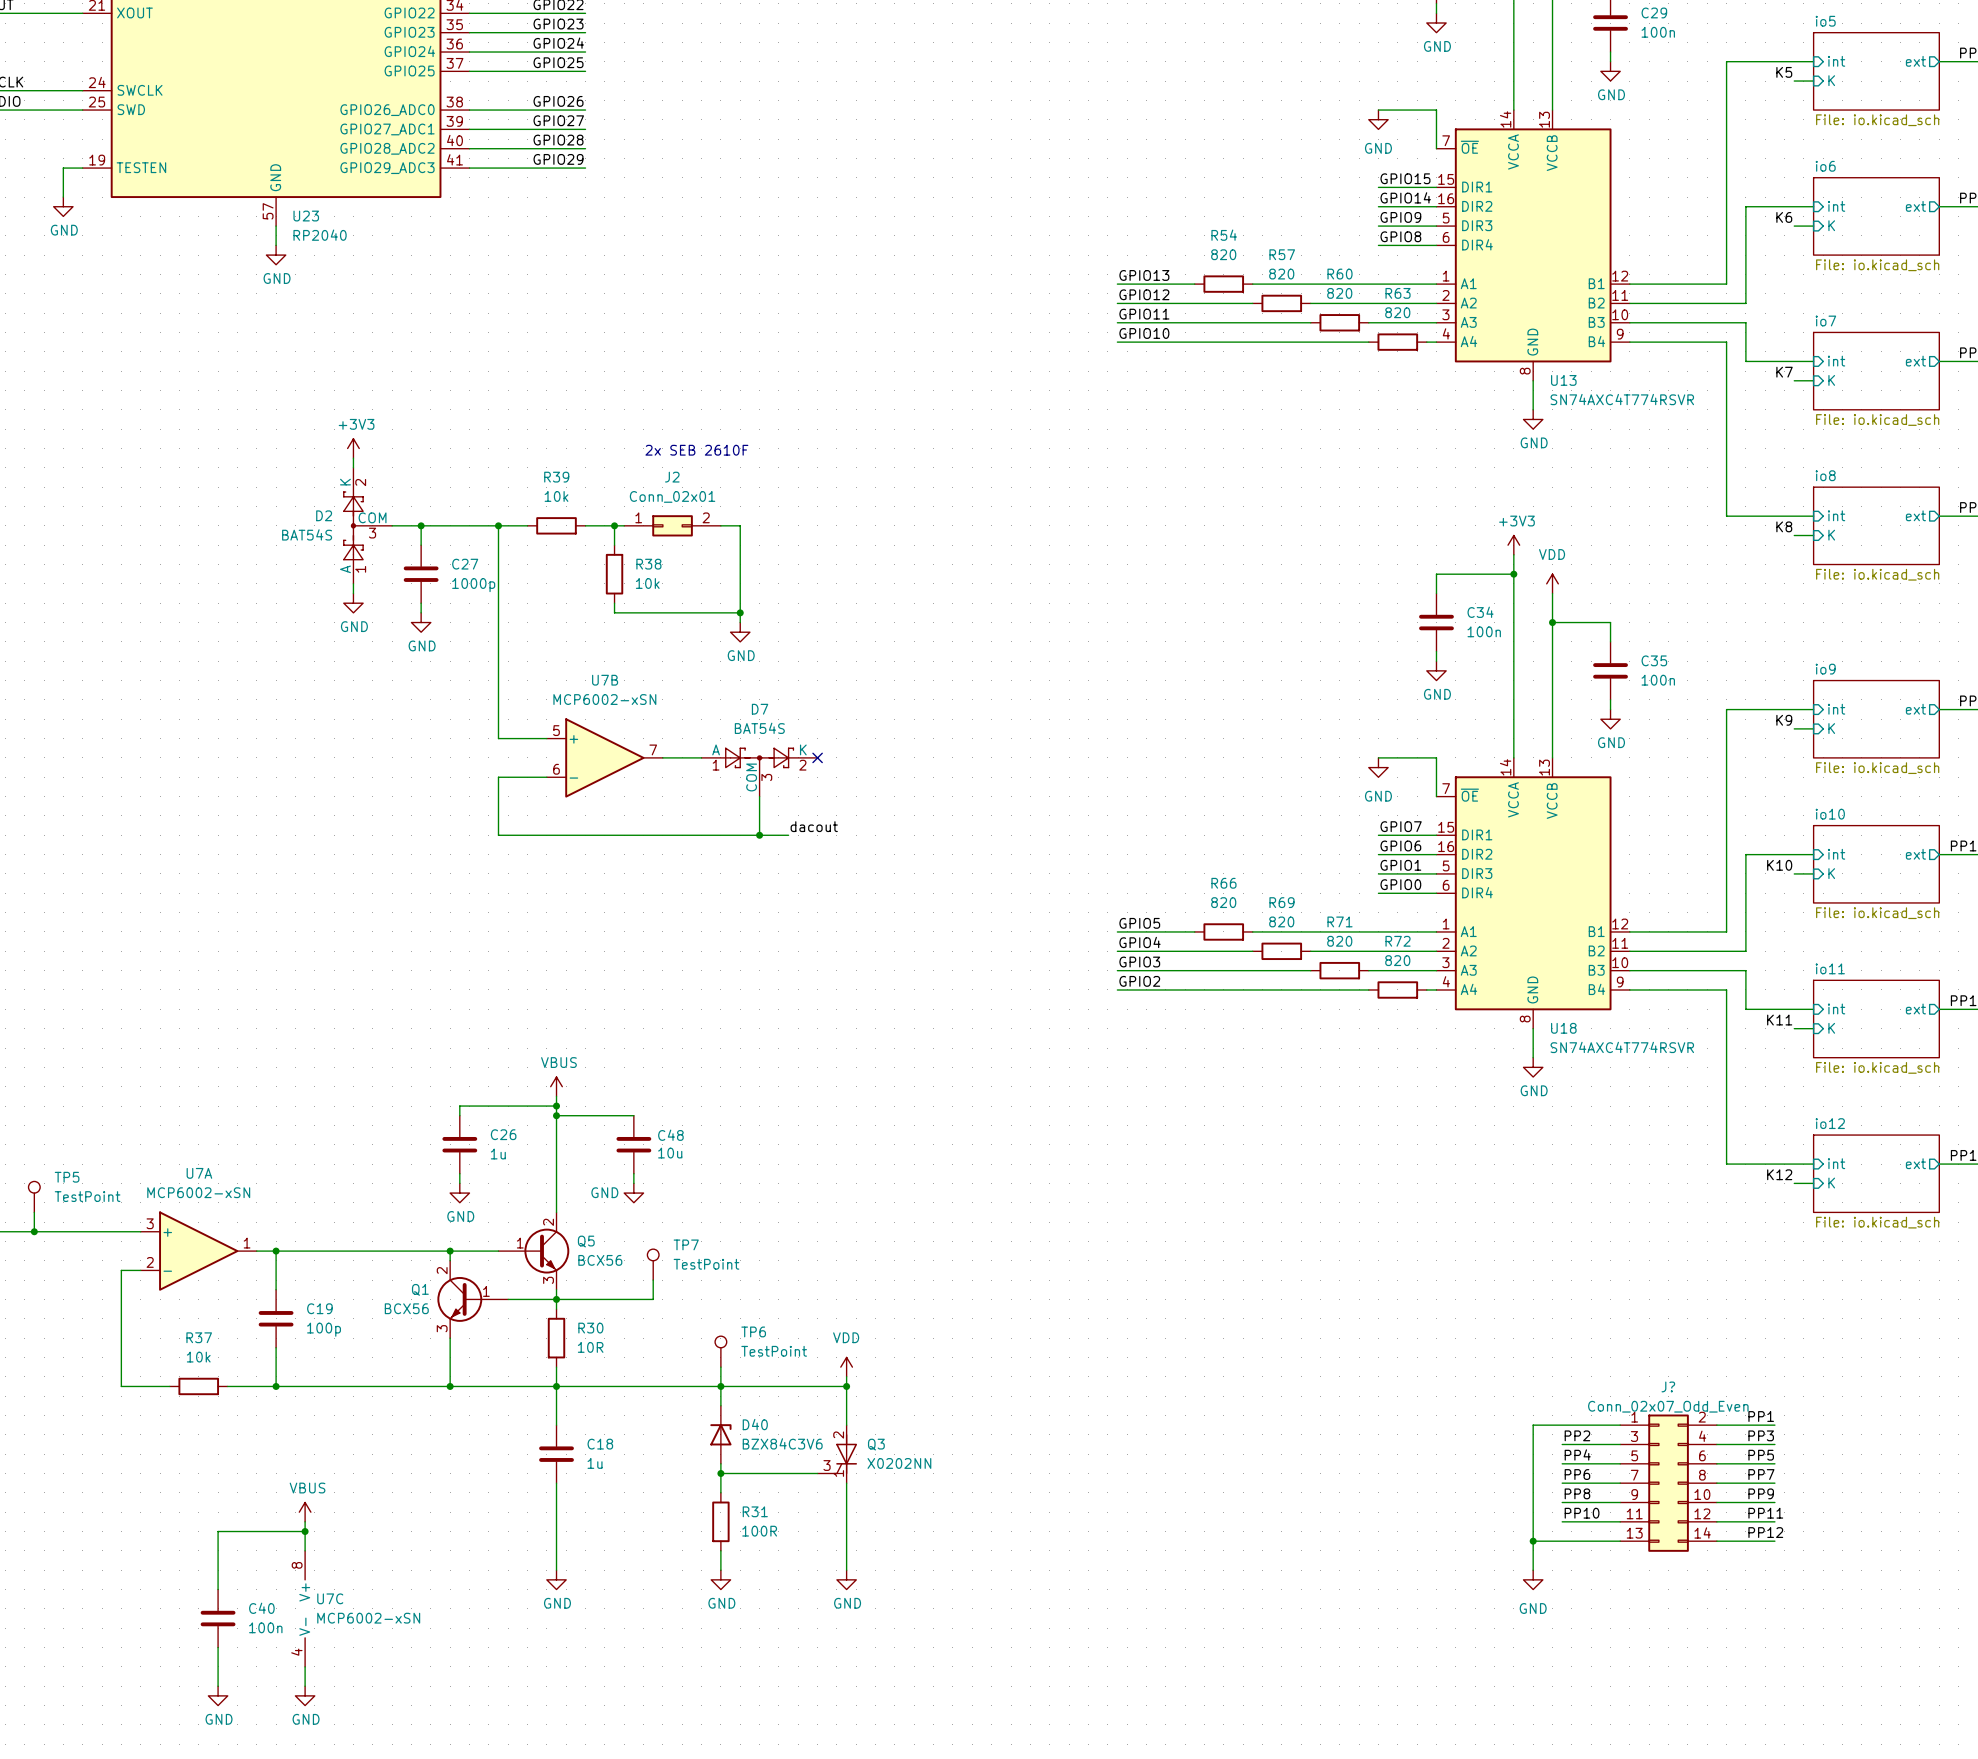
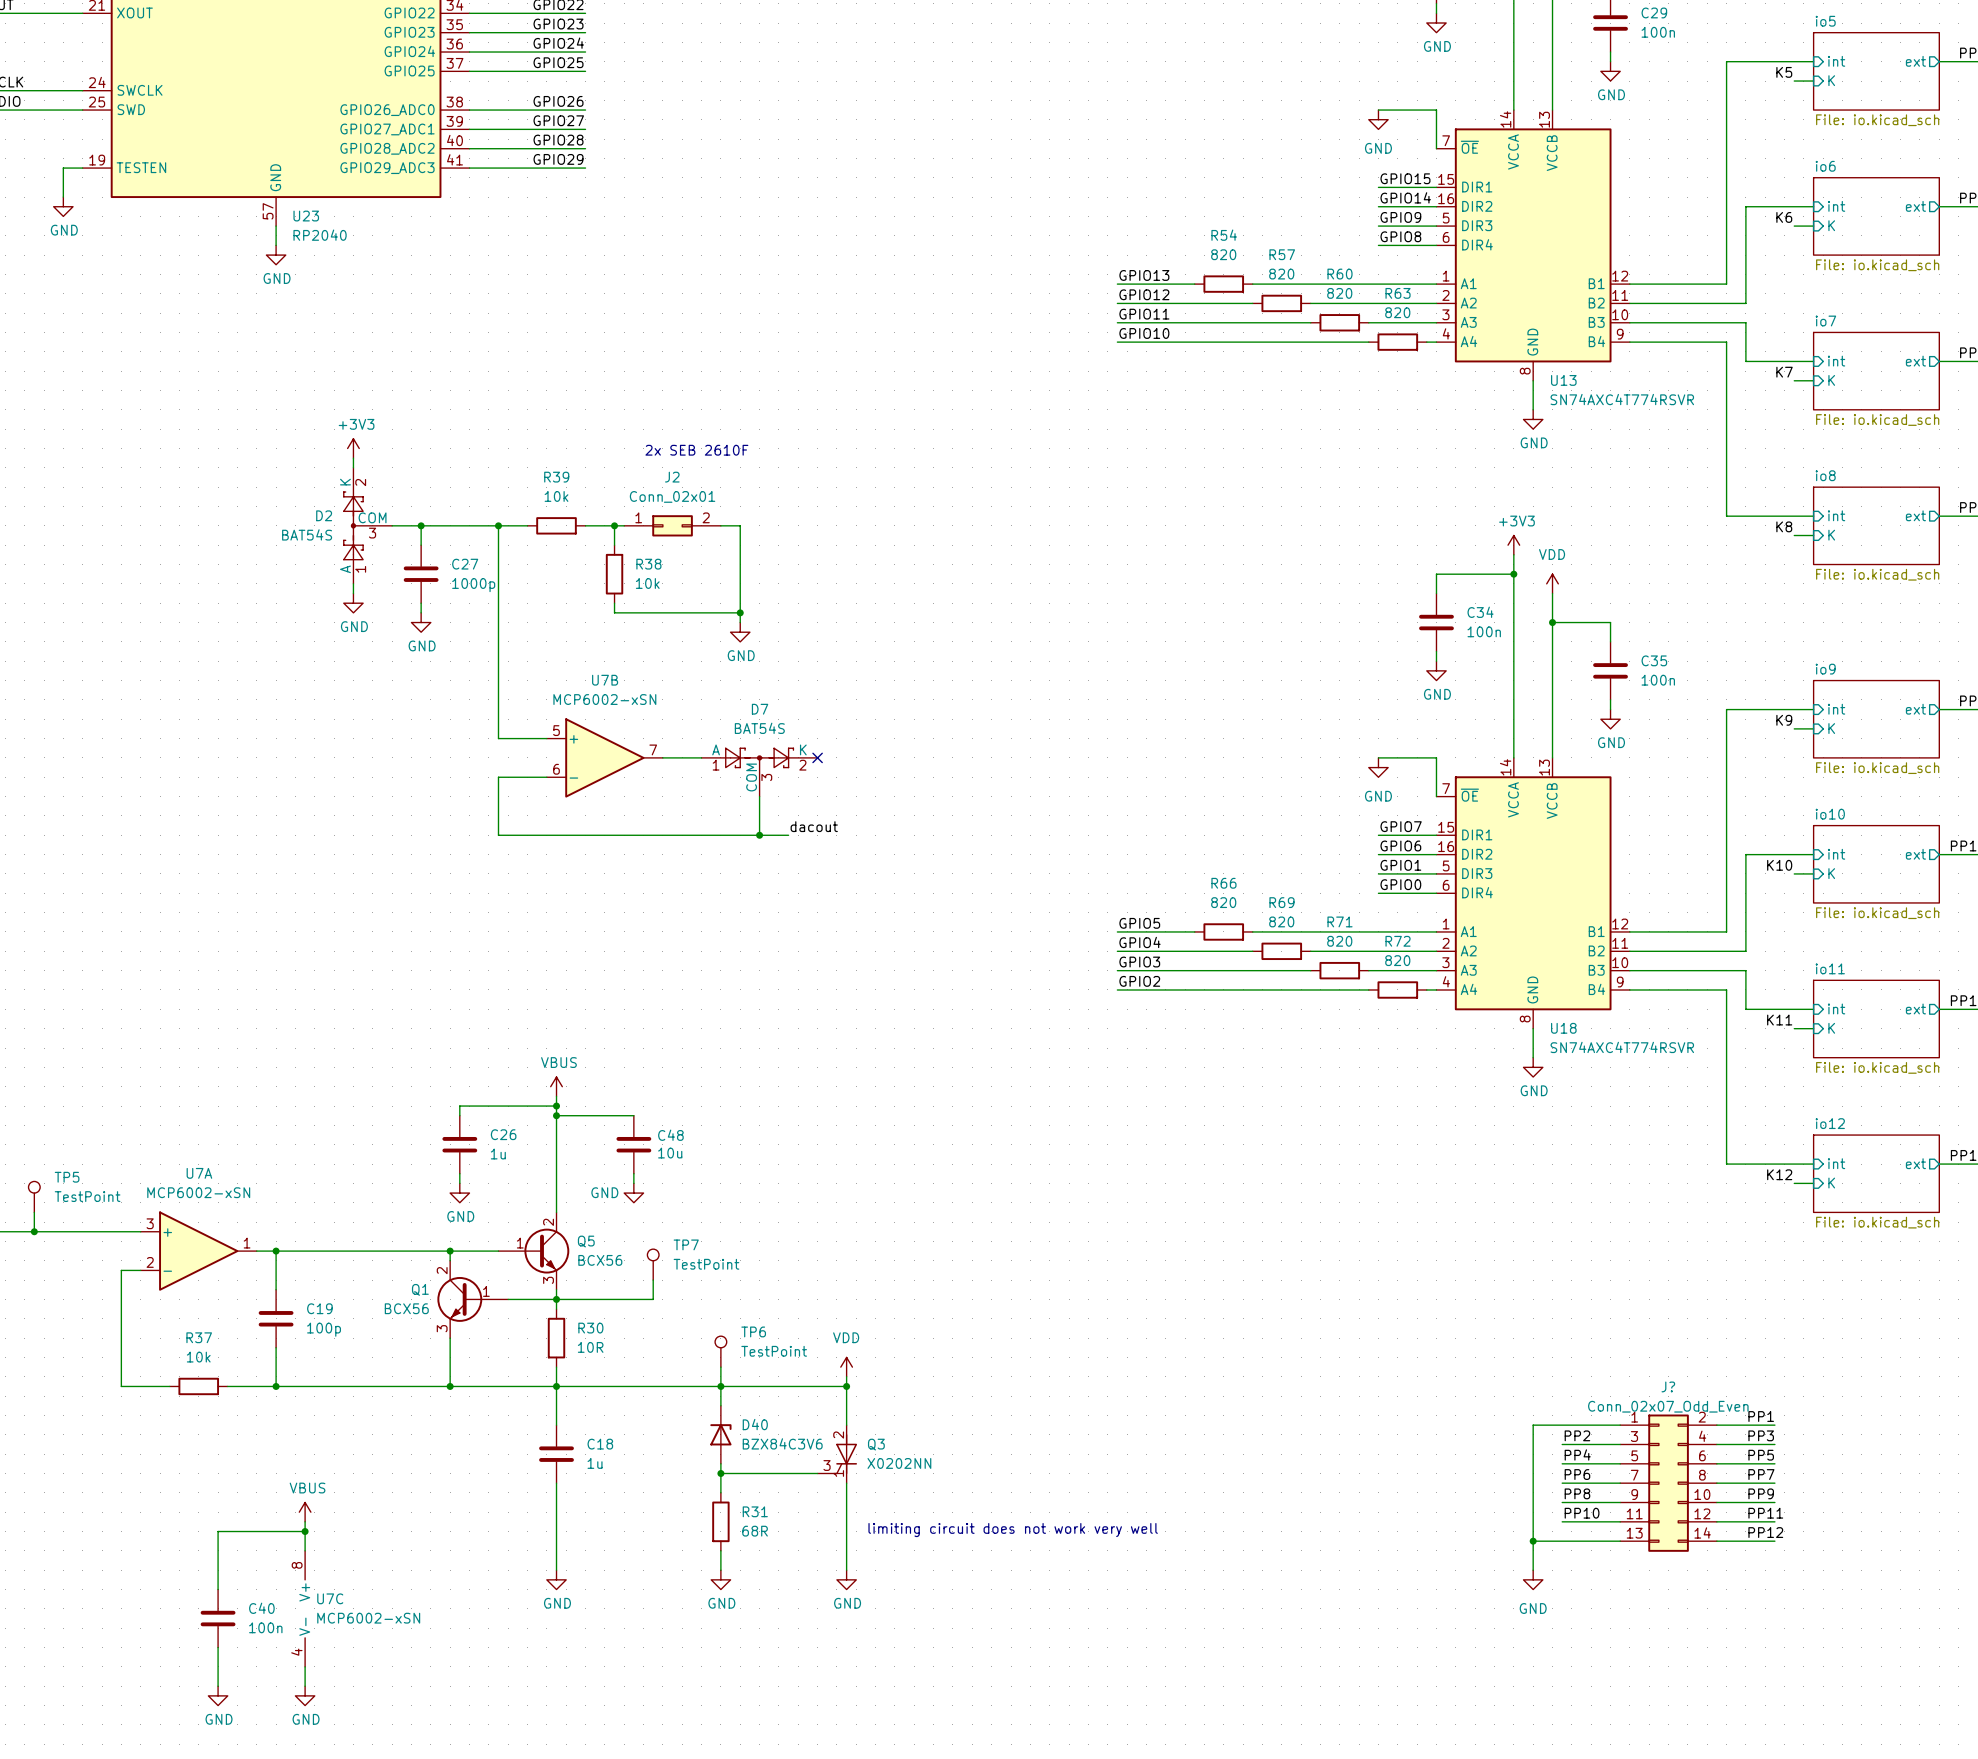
text: none -> limiting circuit does not work very well (1013, 1530)
R31 value: 100R (759, 1531) -> 68R (755, 1531)

